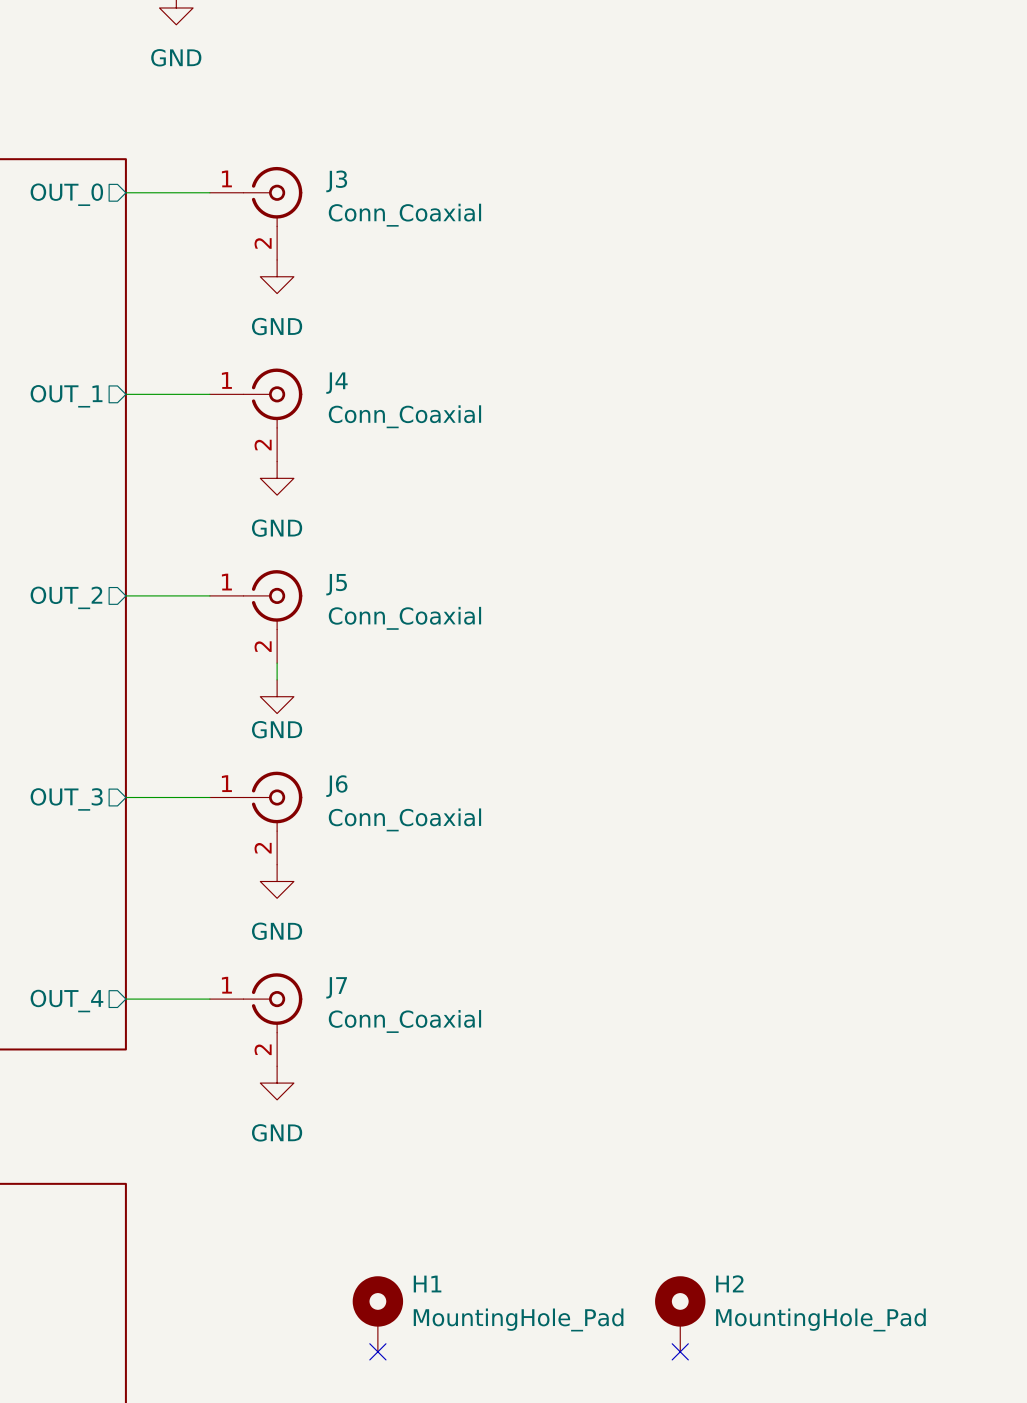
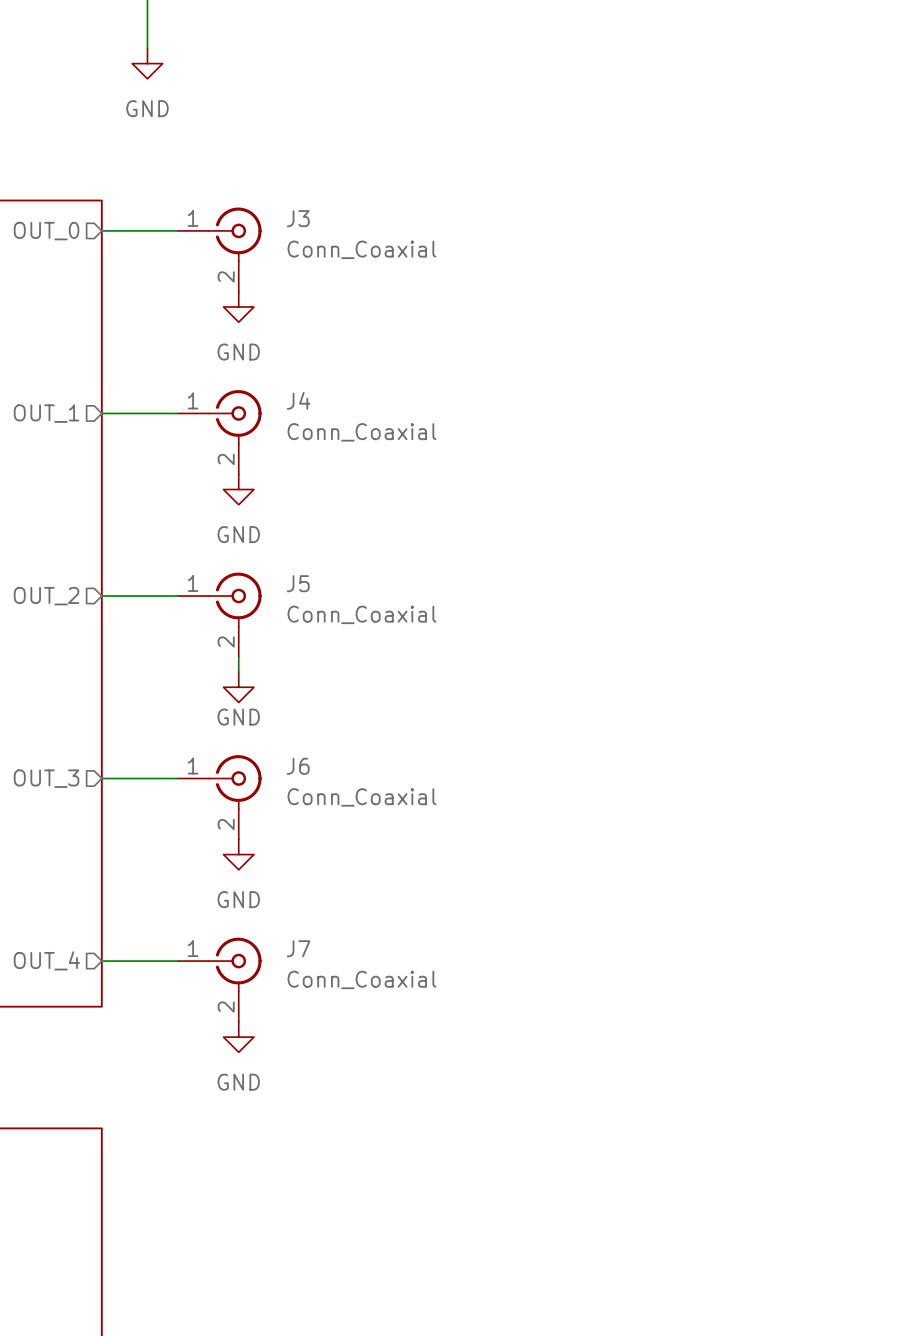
H1: MountingHole_Pad (377, 1314) -> none
H2: MountingHole_Pad (680, 1314) -> none
no-connect mark: (377, 1351) -> none
no-connect mark: (680, 1351) -> none

